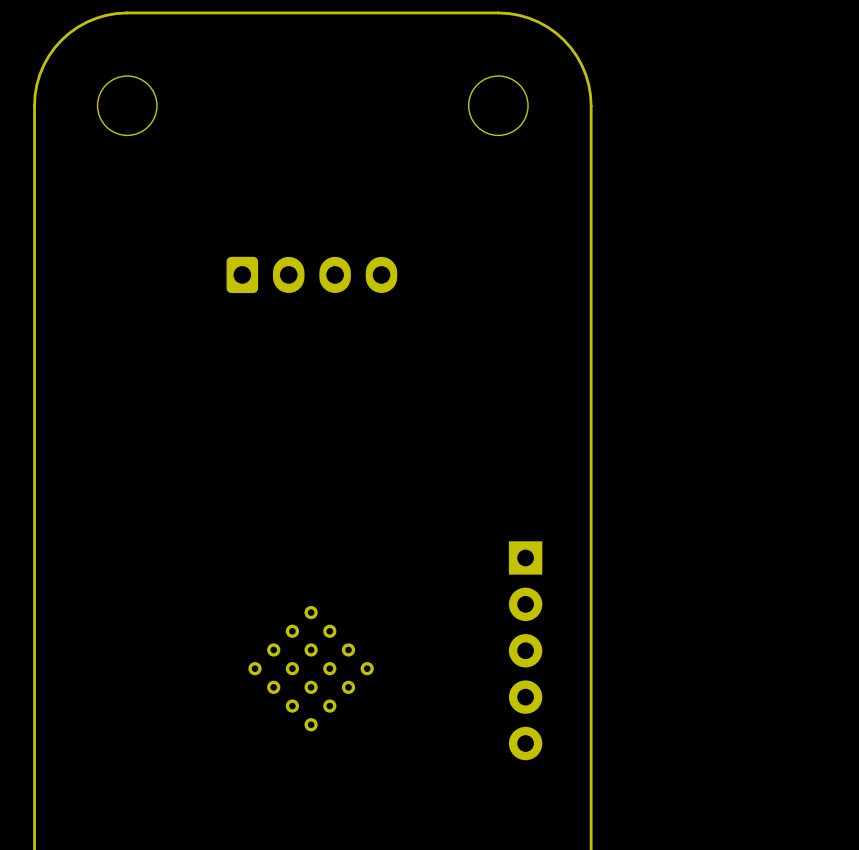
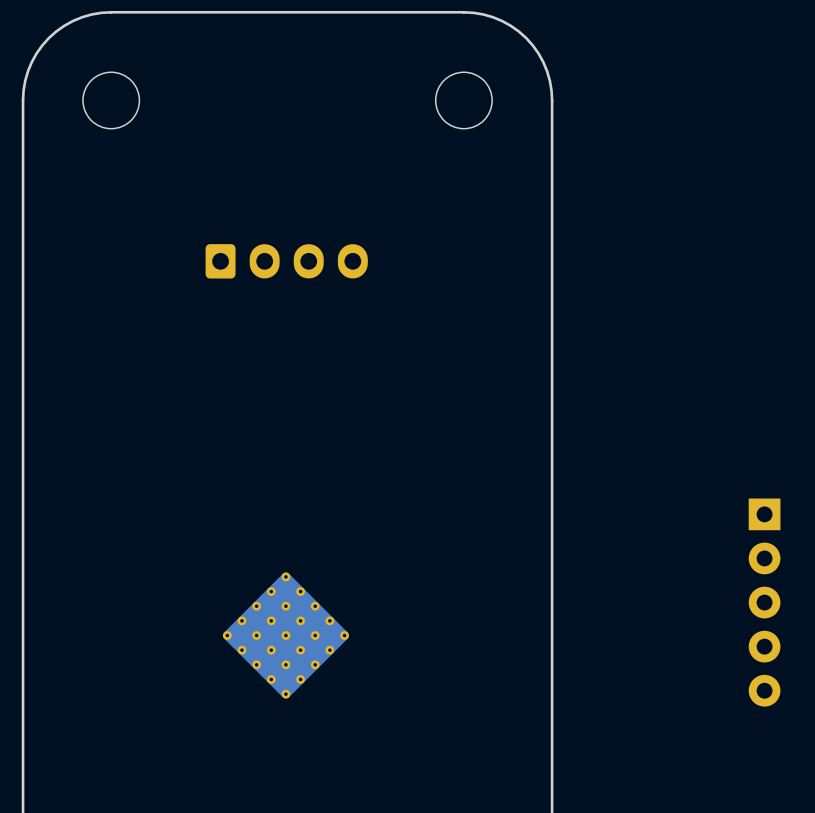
part footprint: [248, 605, 374, 732] -> [222, 572, 349, 699]
part position: (525, 650) -> (764, 602)

